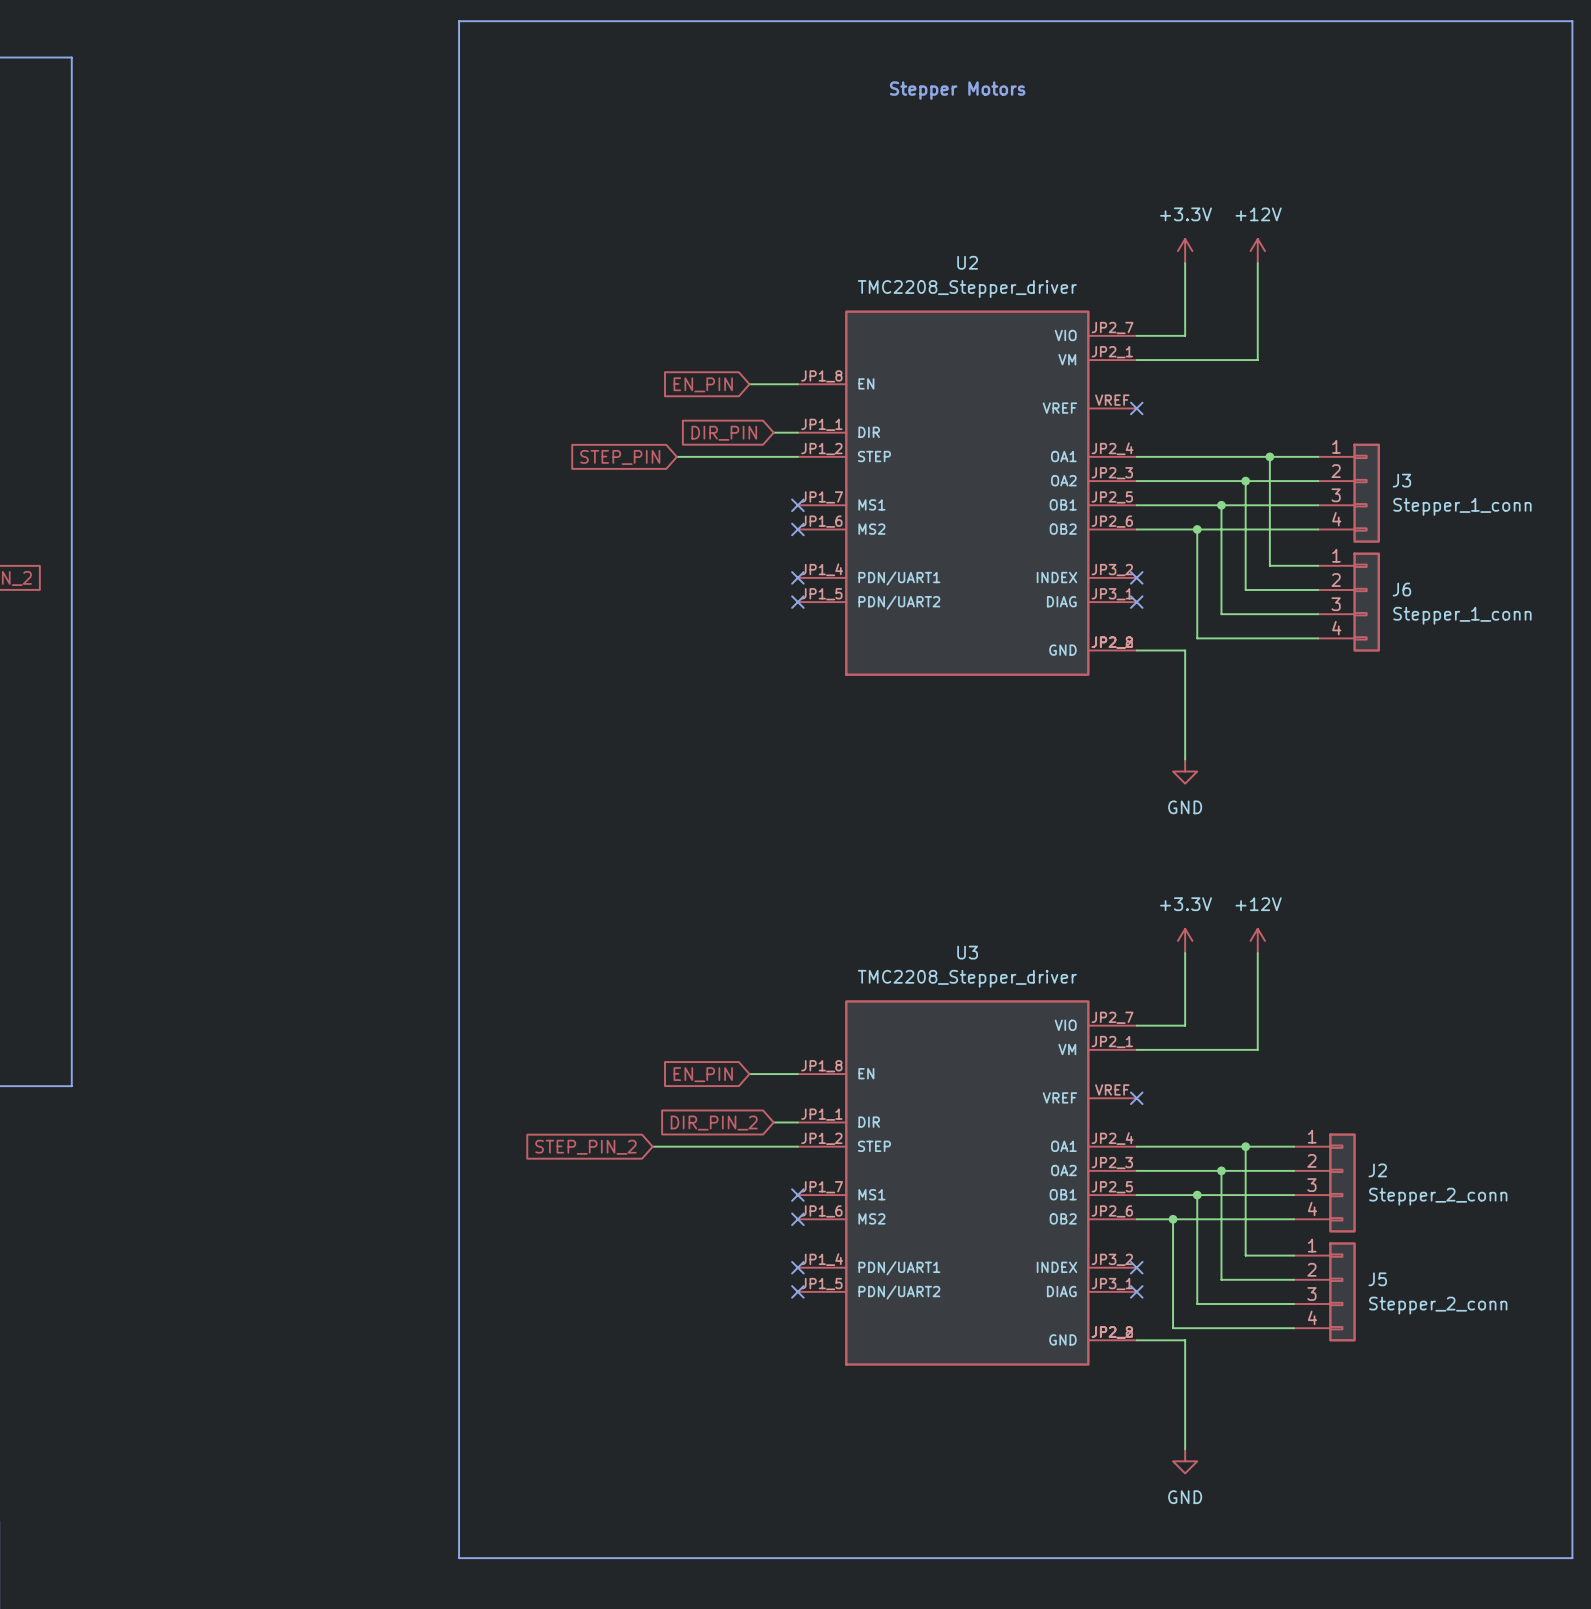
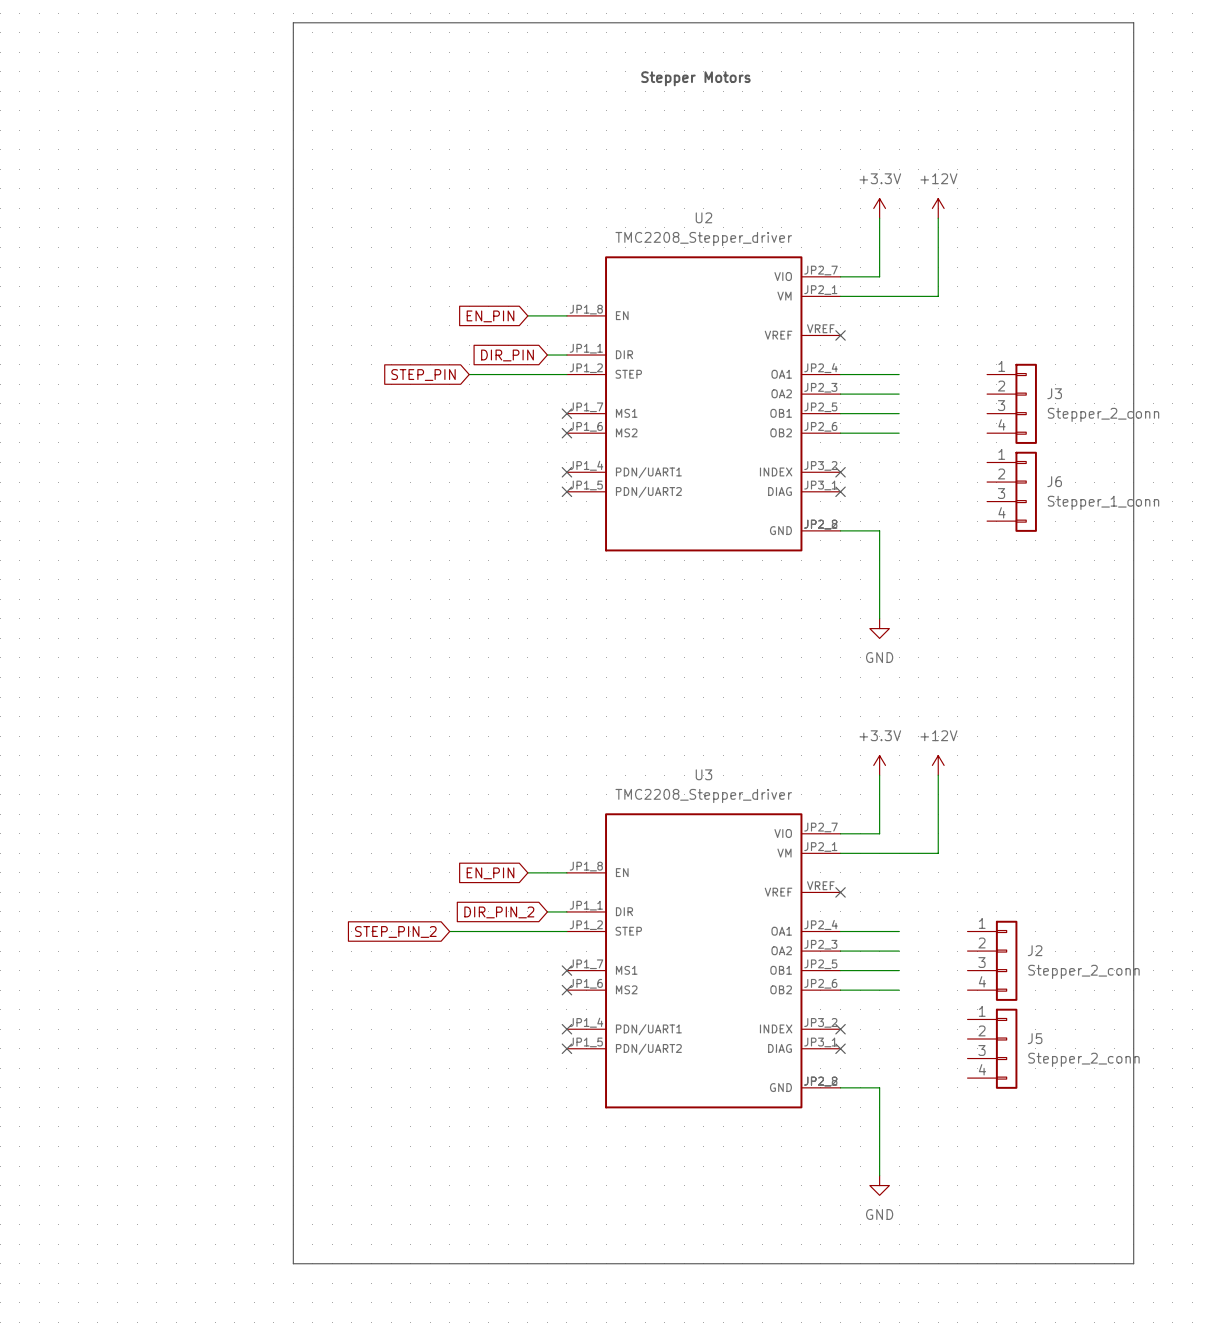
line: (1499, 21) (1572, 21) (1572, 1558) (1499, 1558) -> (1133, 22) (1133, 1263)
wire: (1209, 456) (1318, 456) -> none
wire: (1269, 456) (1269, 565) (1318, 565) -> none
junction: (1269, 456) -> none
wire: (1209, 481) (1318, 481) -> none
wire: (1245, 481) (1245, 589) (1318, 589) -> none
junction: (1245, 481) -> none
wire: (1209, 505) (1318, 505) -> none
wire: (1221, 505) (1221, 614) (1318, 614) -> none
junction: (1221, 505) -> none
J3 value: Stepper_1_conn (1462, 506) -> Stepper_2_conn (1103, 414)
wire: (1197, 529) (1197, 638) (1318, 638) -> none
junction: (1197, 529) -> none
wire: (1209, 529) (1318, 529) -> none
wire: (1209, 1146) (1294, 1146) -> none
wire: (1245, 1146) (1245, 1255) (1294, 1255) -> none
junction: (1245, 1146) -> none
wire: (1209, 1170) (1294, 1170) -> none
wire: (1221, 1170) (1221, 1279) (1294, 1279) -> none
junction: (1221, 1170) -> none
wire: (1197, 1195) (1197, 1304) (1294, 1304) -> none
junction: (1197, 1195) -> none
wire: (1209, 1195) (1294, 1195) -> none
wire: (1173, 1219) (1173, 1328) (1294, 1328) -> none
junction: (1173, 1219) -> none
wire: (1209, 1219) (1294, 1219) -> none

